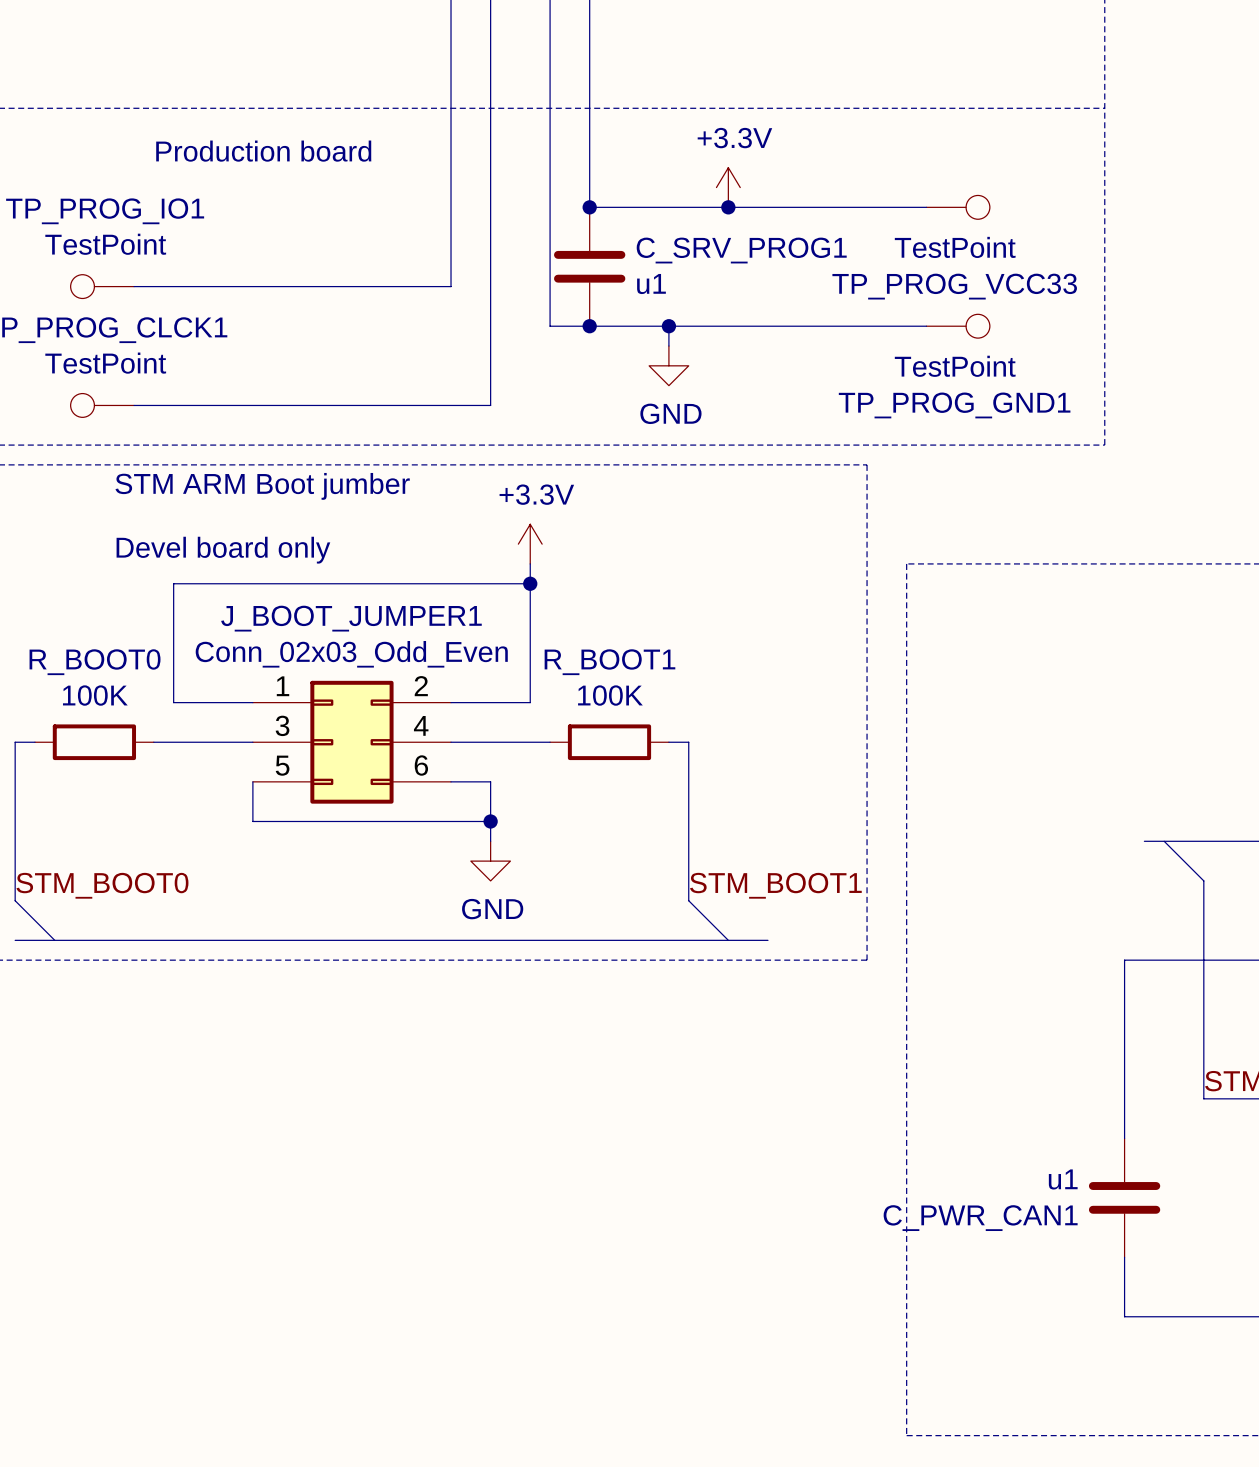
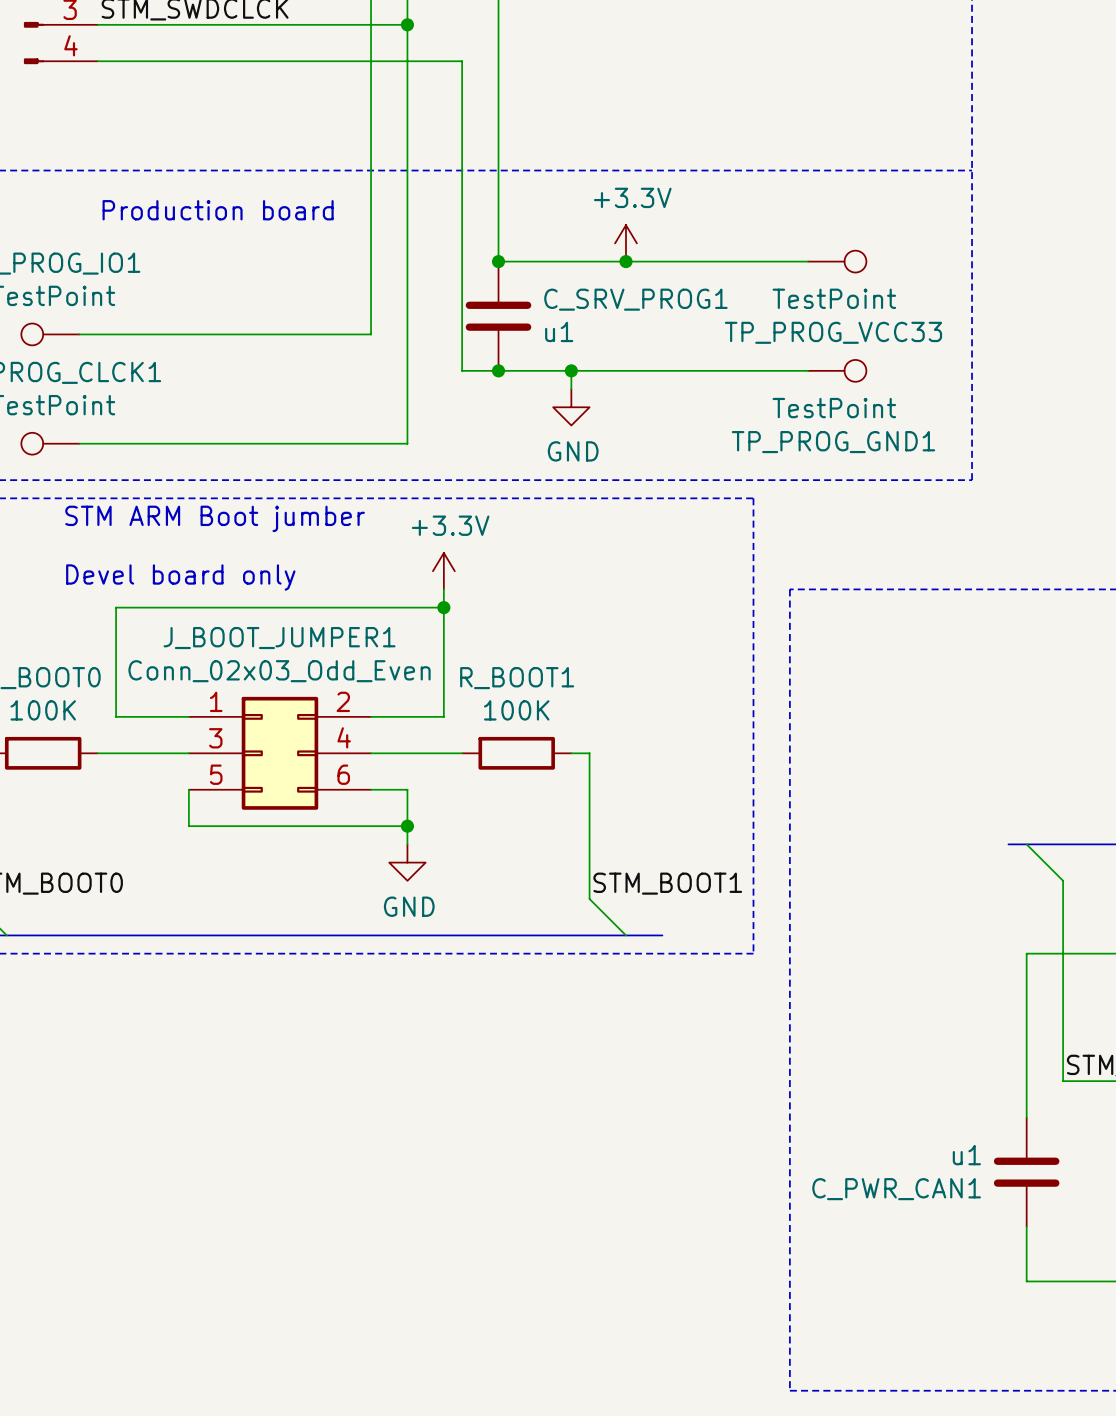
wire: (1164, 960) (1124, 960) (1124, 1138) -> (1026, 953) (1026, 1117)
C_PWR_CAN1 position: (1124, 1197) -> (1026, 1172)
wire: (1124, 1257) (1124, 1316) (1164, 1316) -> (1026, 1226) (1026, 1281)

